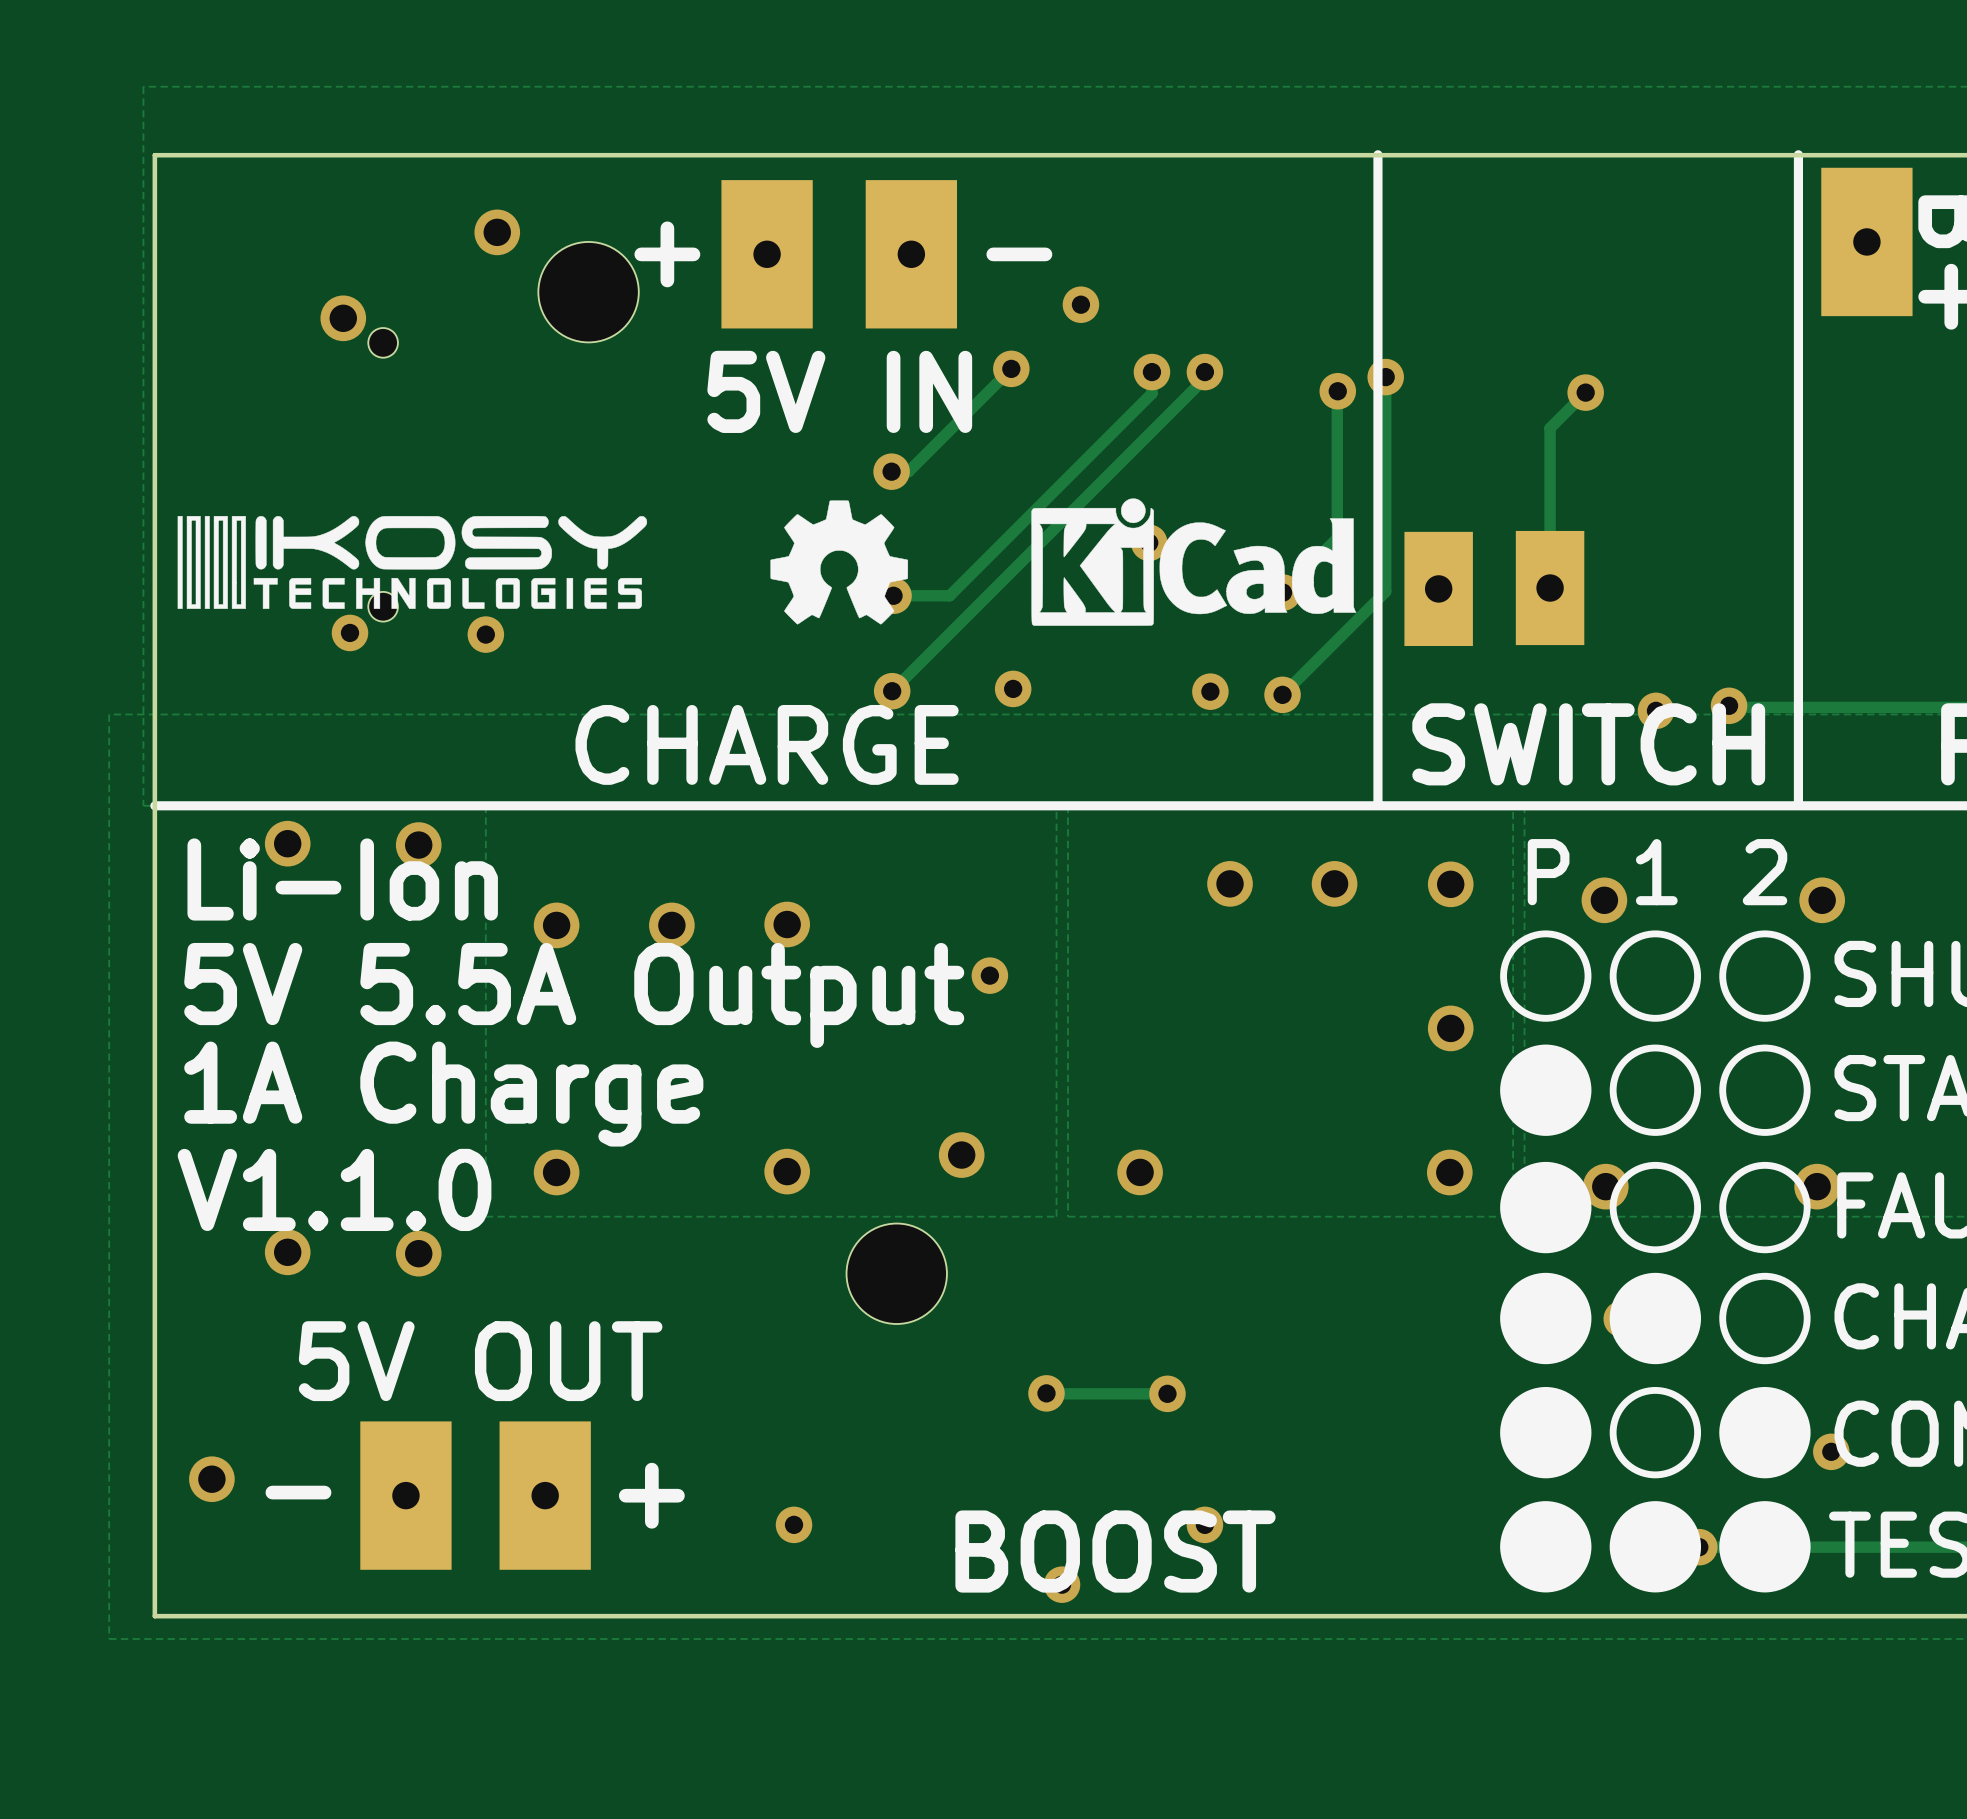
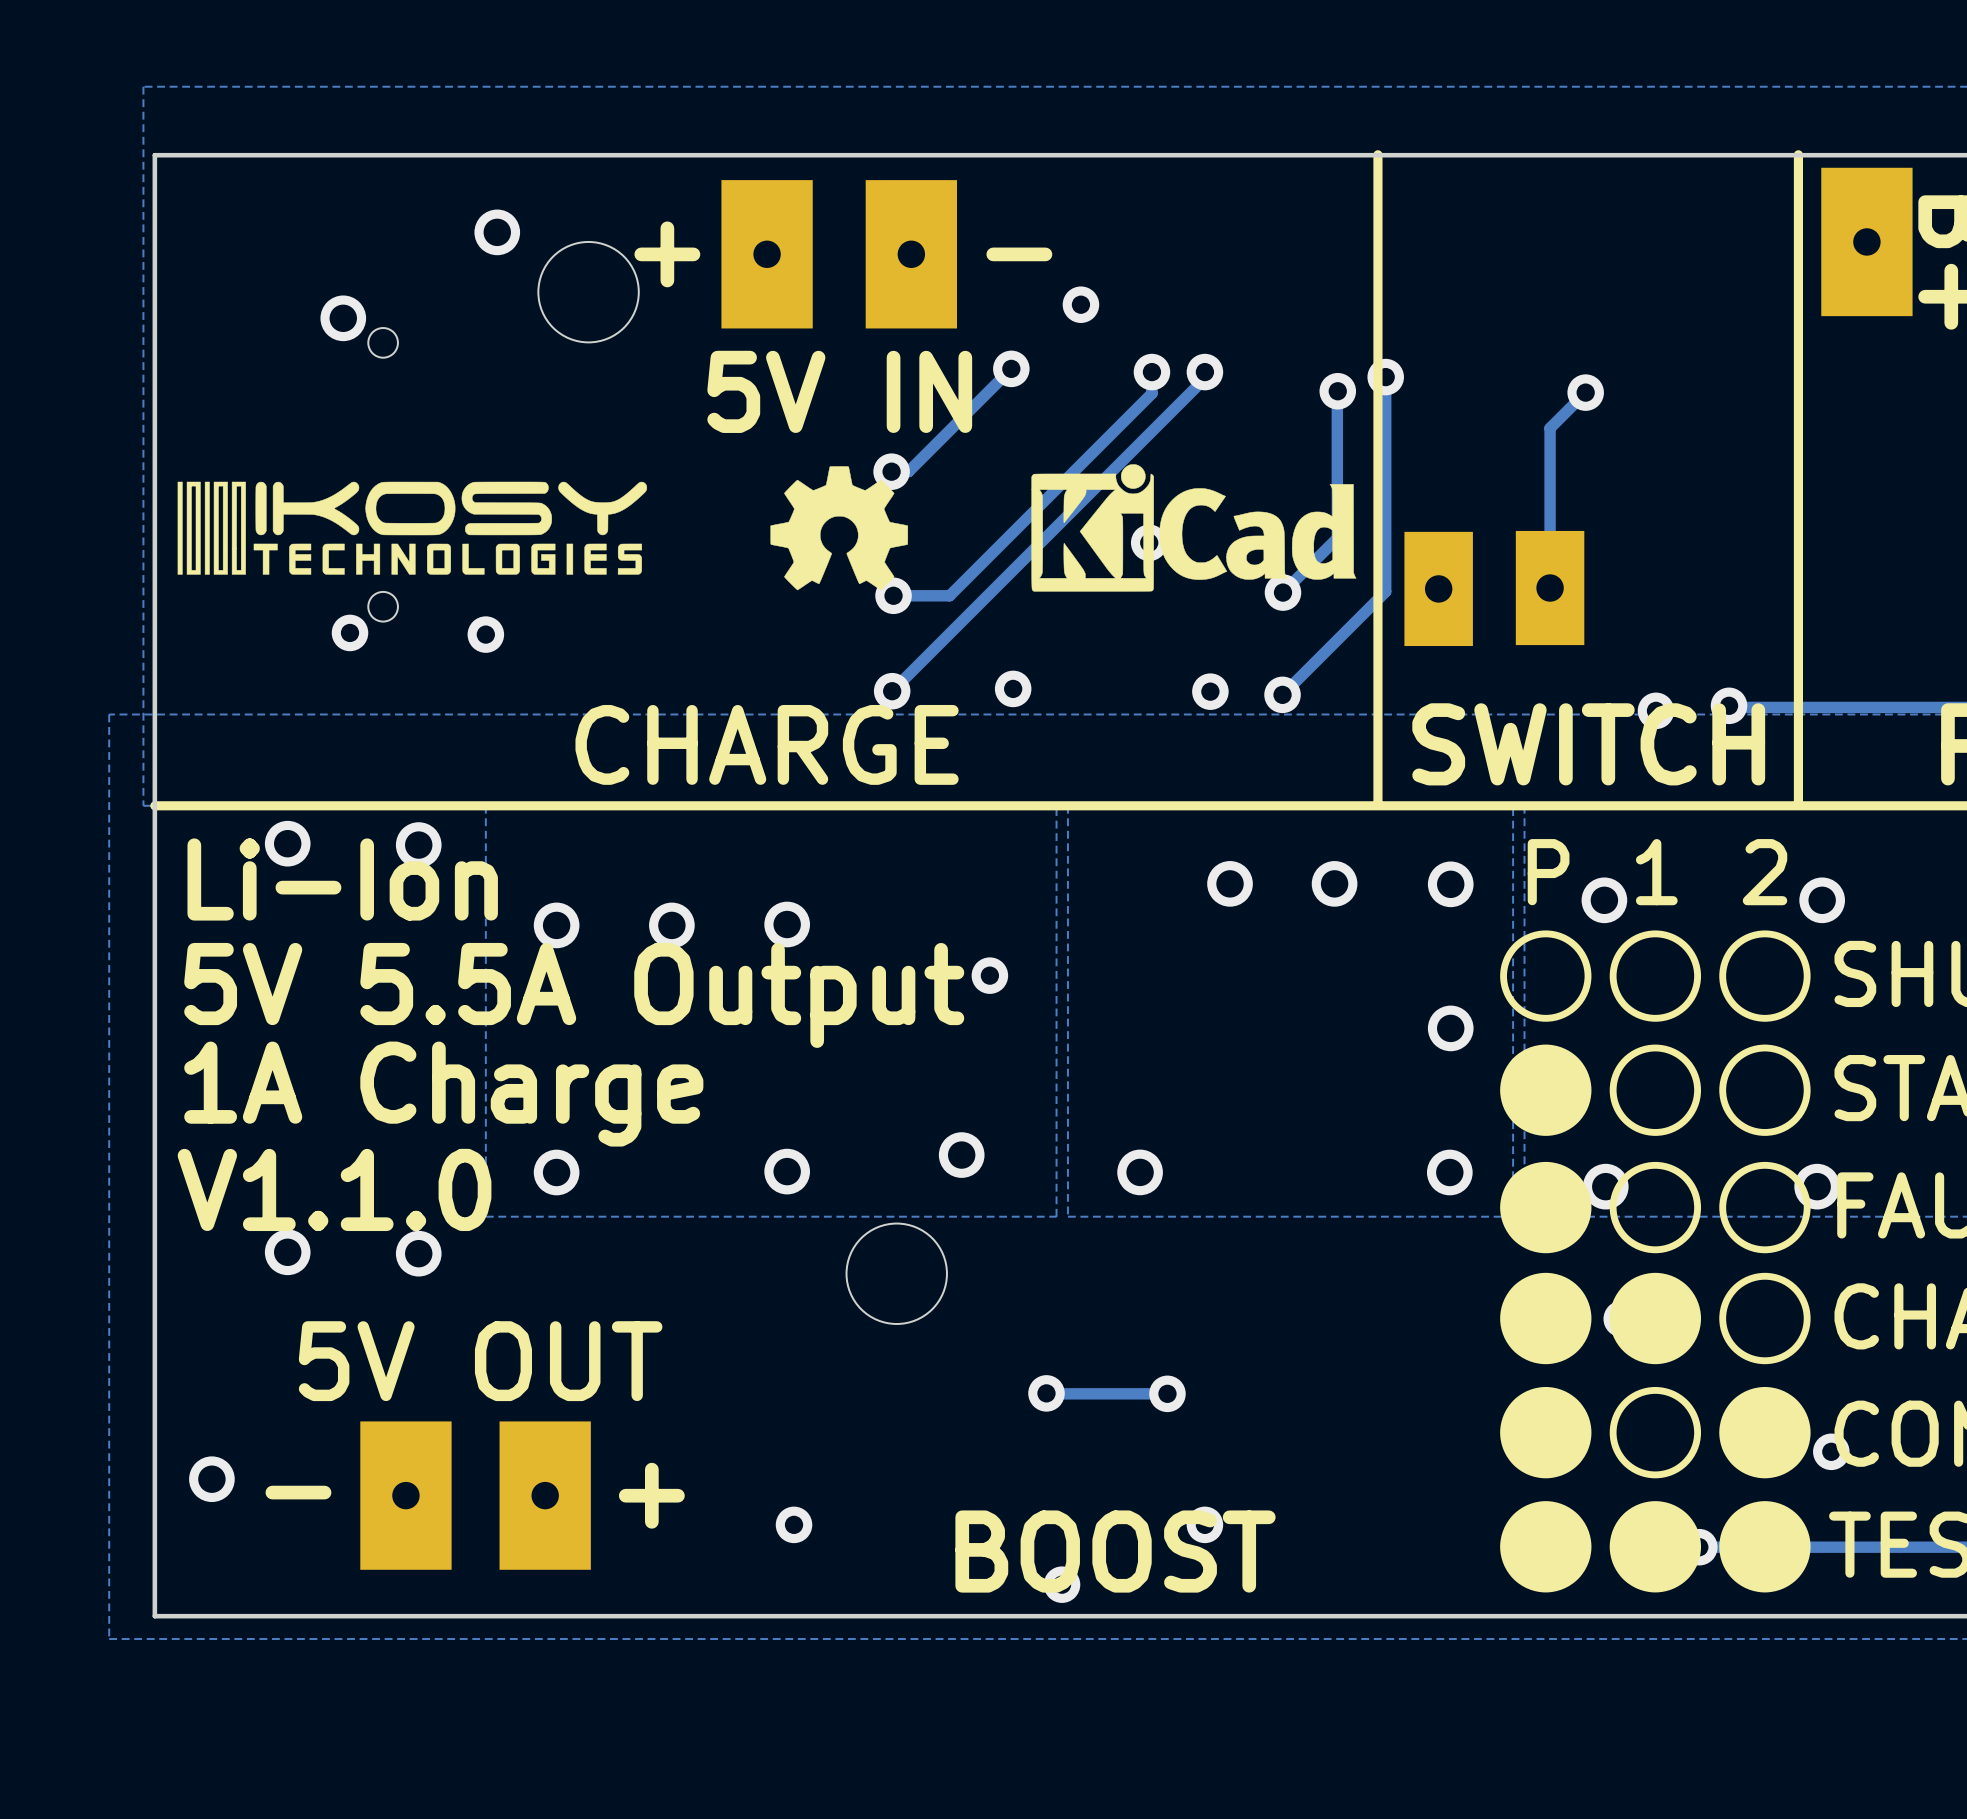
drawing position: (412, 562) -> (412, 528)
drawing position: (839, 562) -> (839, 528)
drawing position: (1193, 562) -> (1193, 527)

